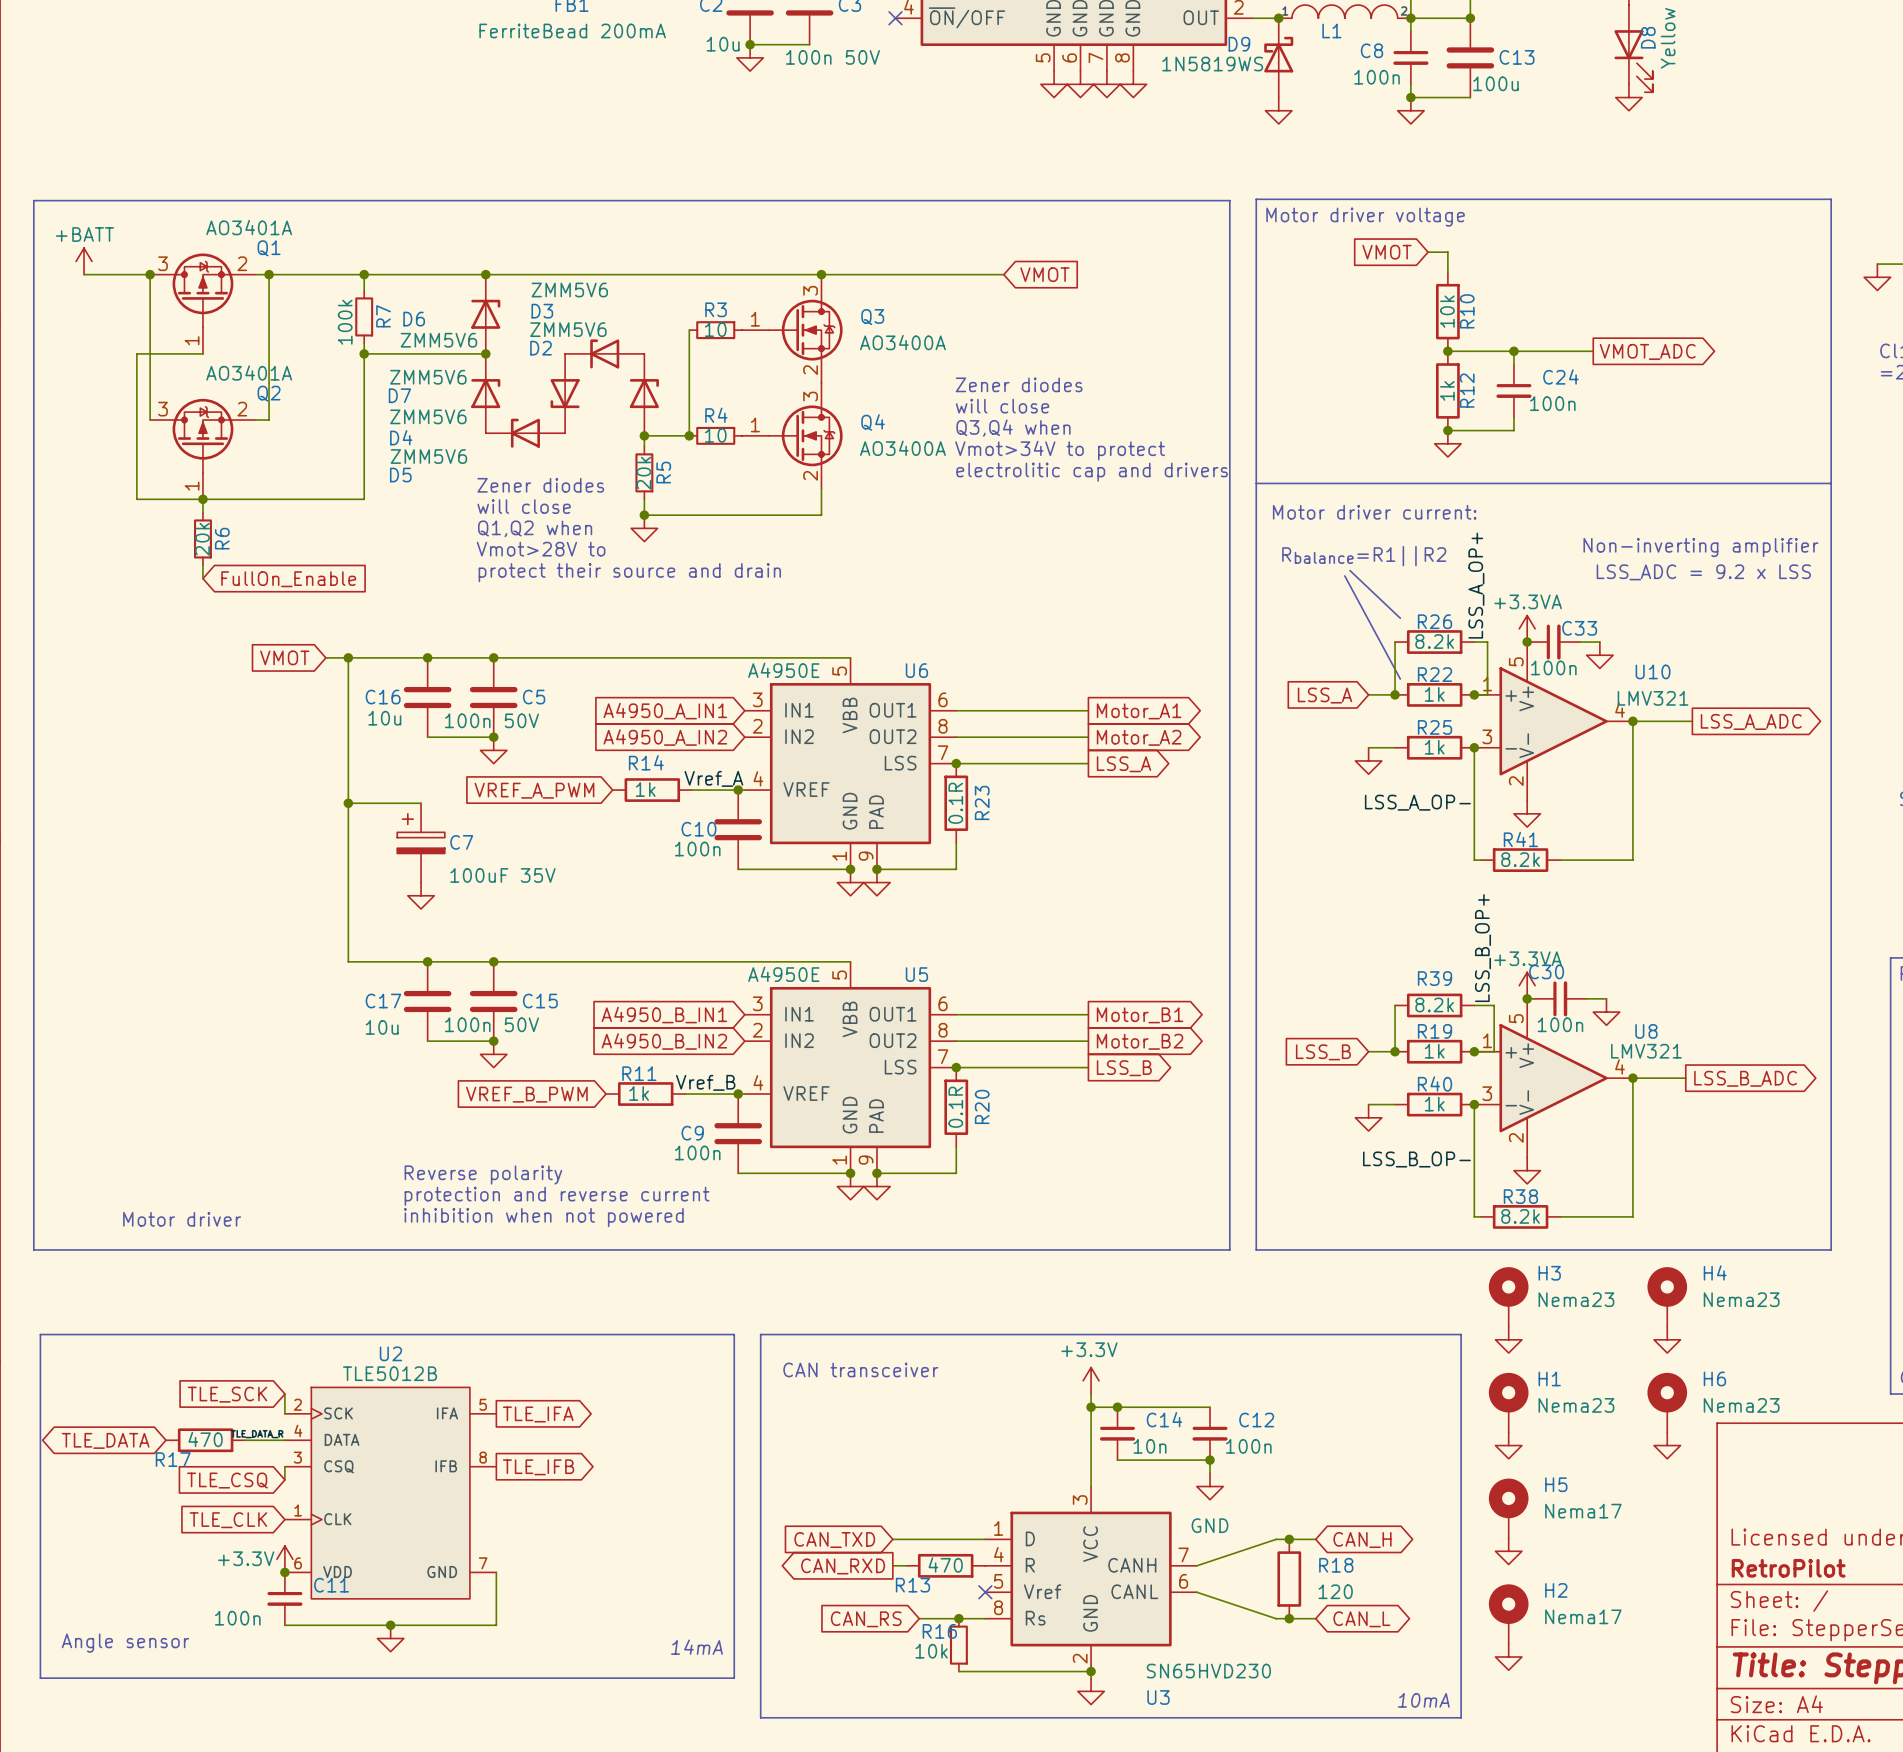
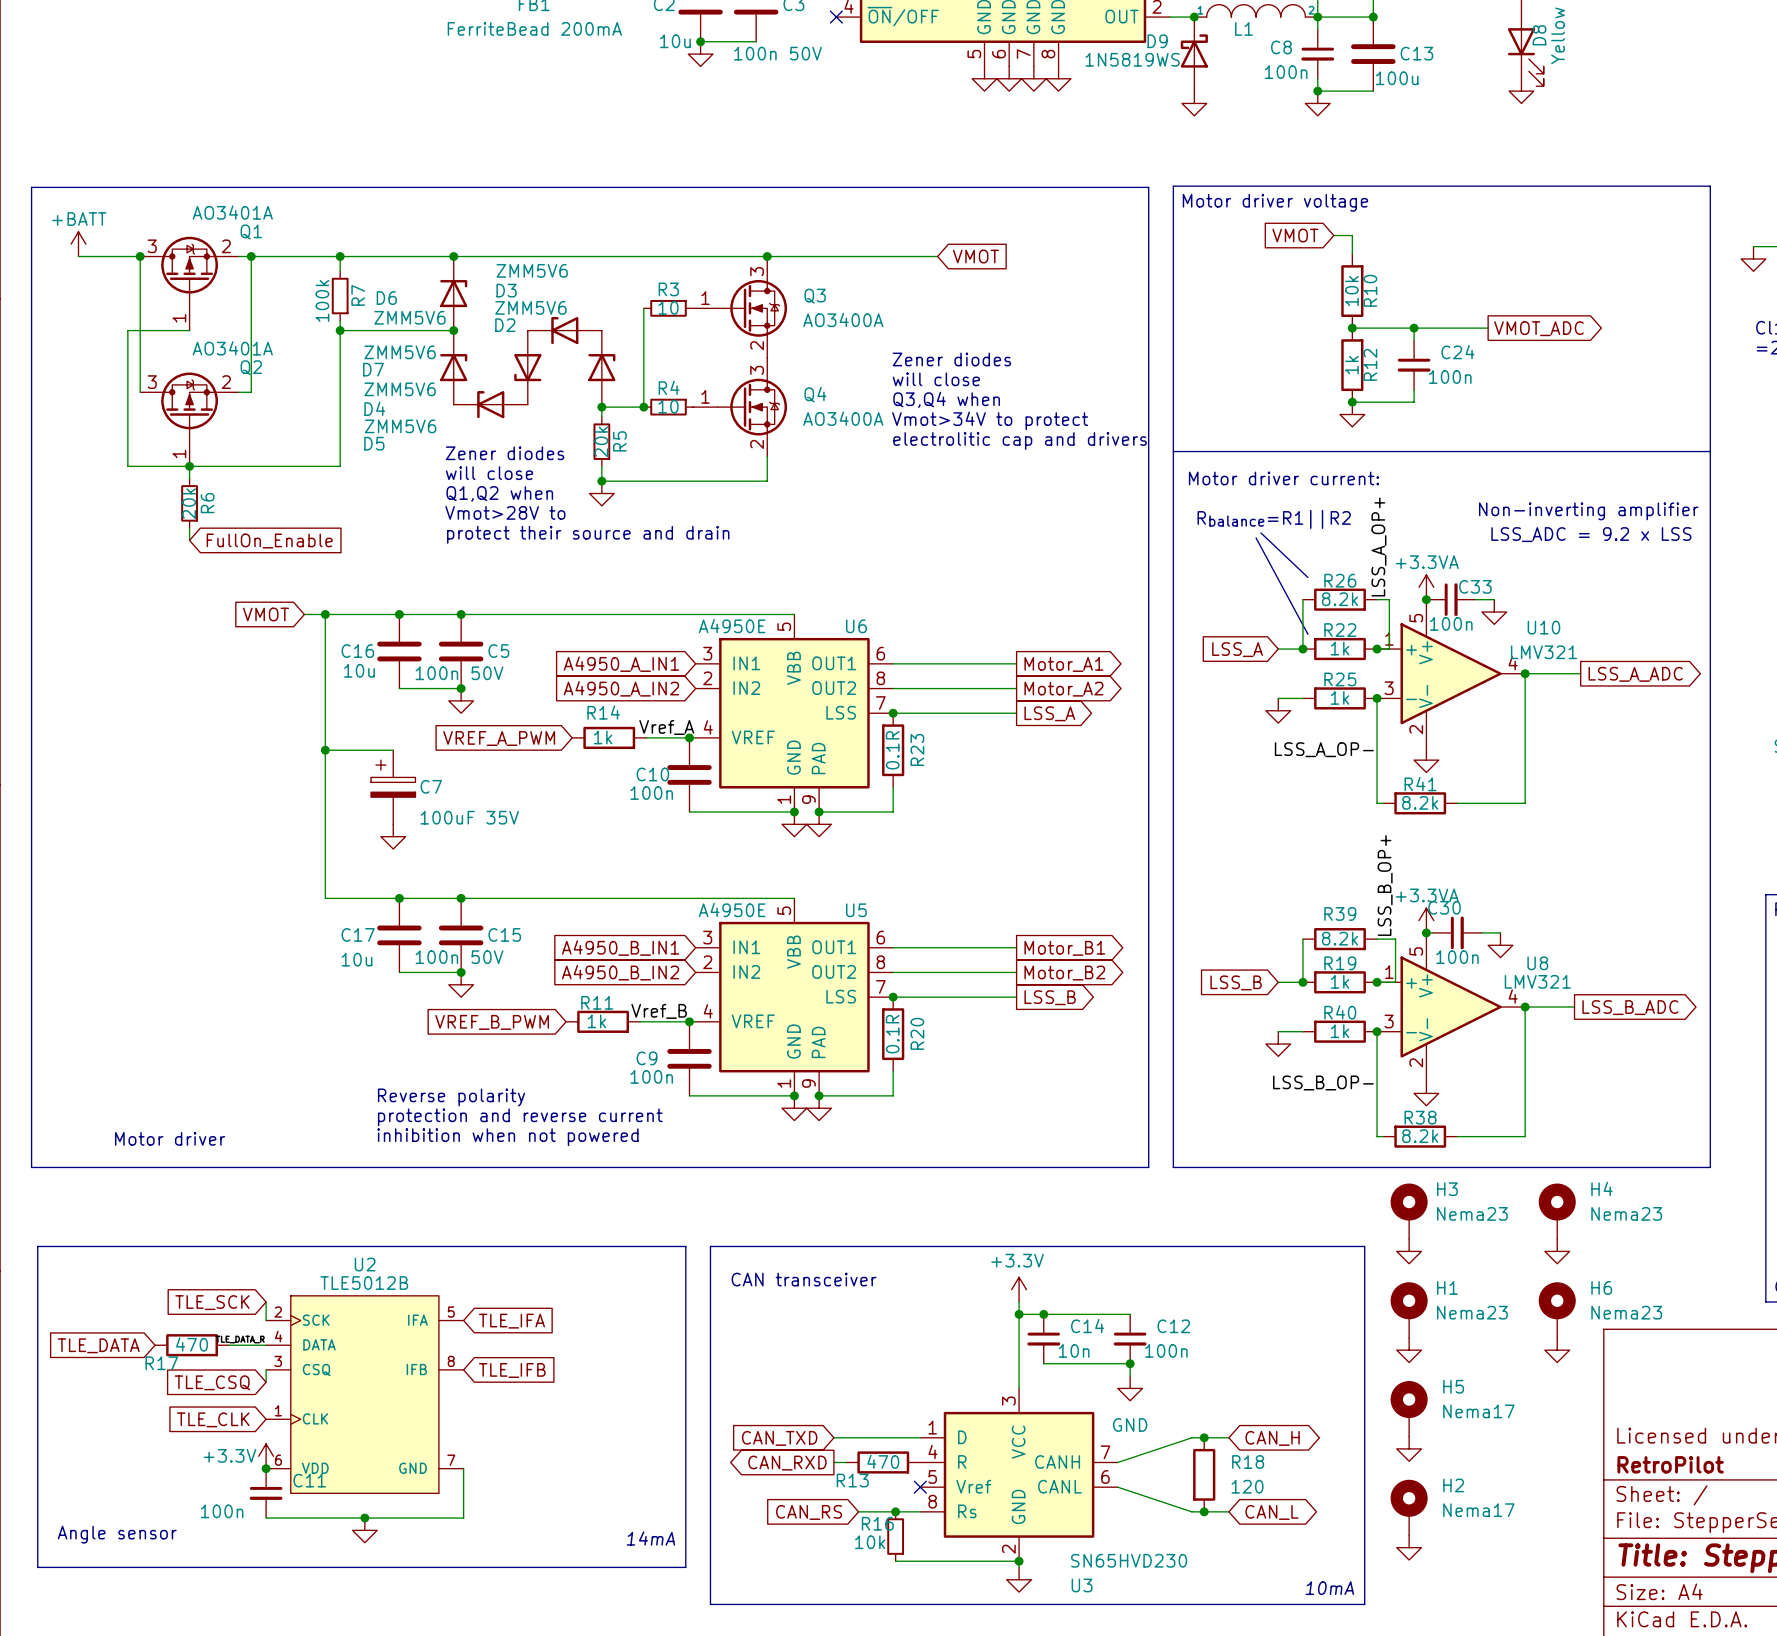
global label shape: output (538, 1414) -> input (511, 1321)
global label shape: bidirectional (105, 1440) -> input (98, 1345)
global label shape: output (538, 1467) -> input (512, 1370)

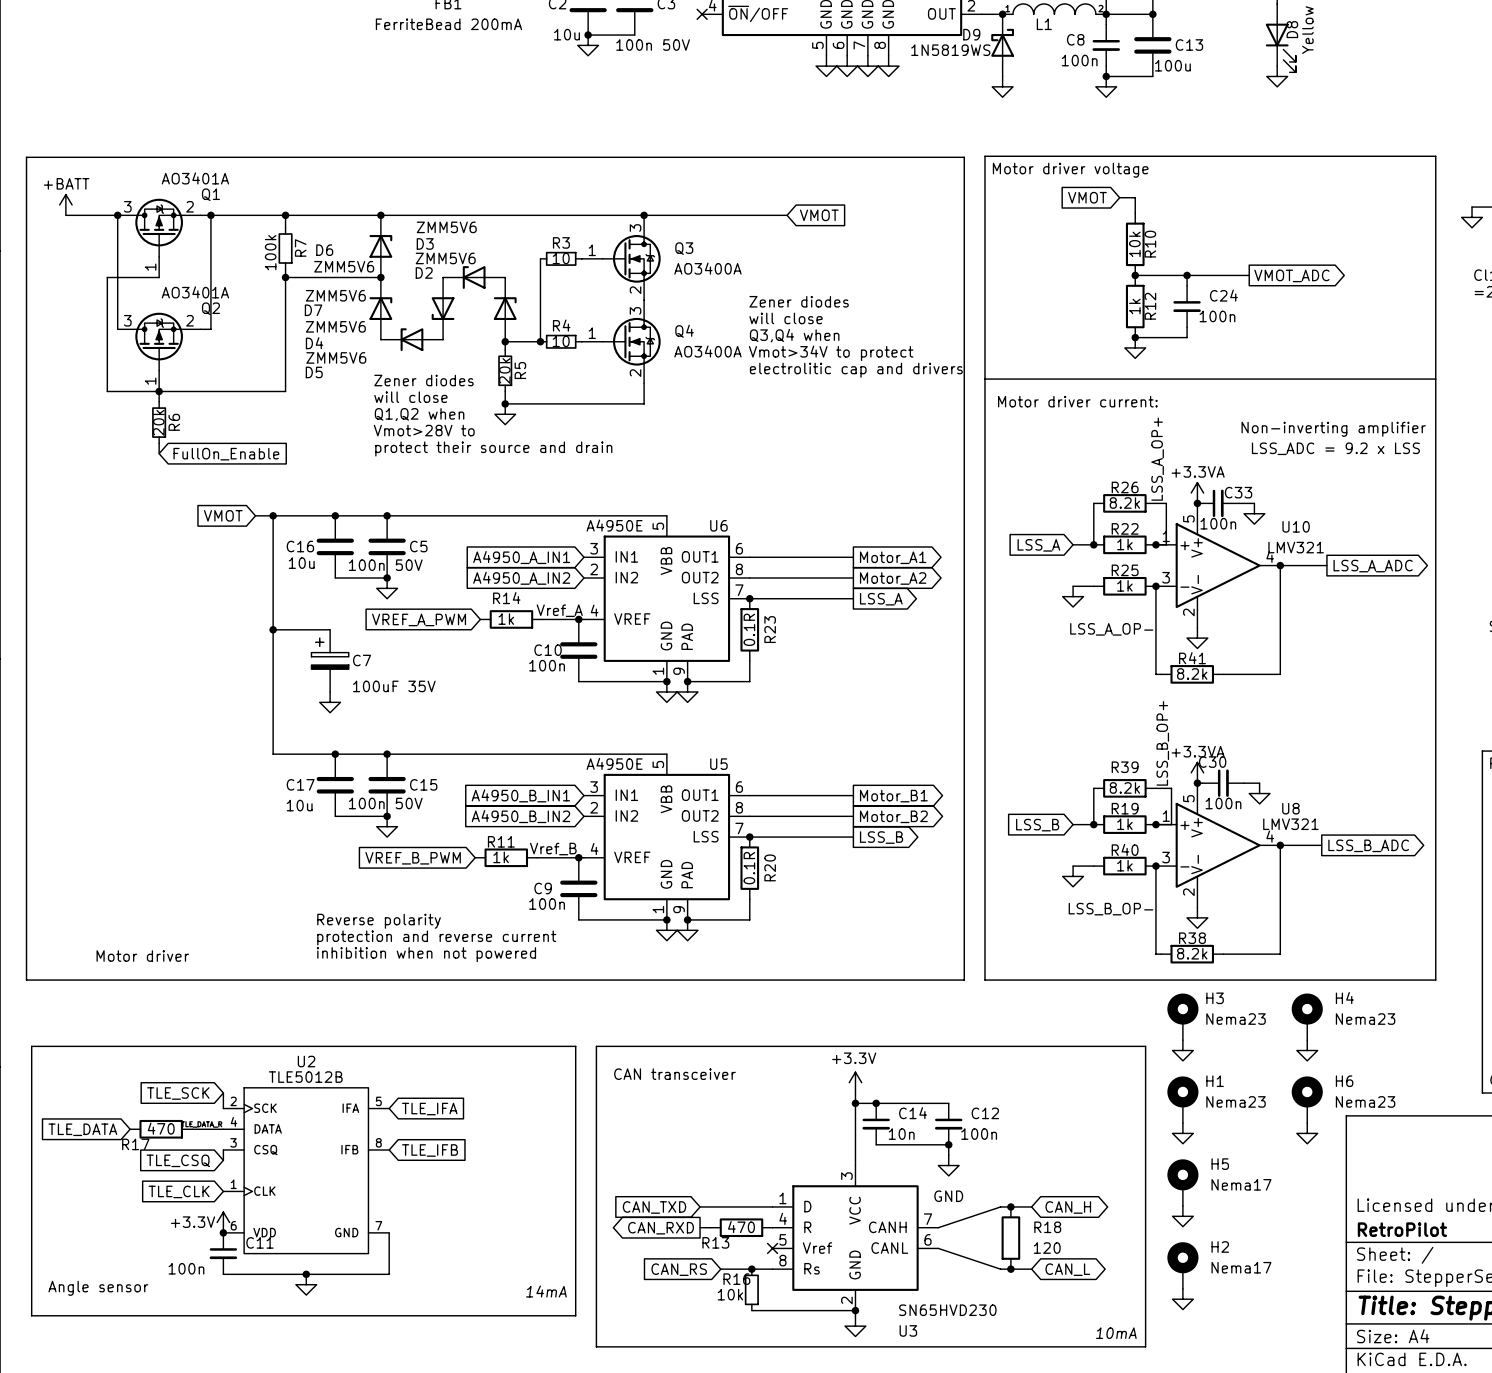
text: Rbalance=R1||R2 (1274, 519) -> none
line: (1261, 533) (1307, 577) -> none
line: (1256, 537) (1307, 634) -> none

